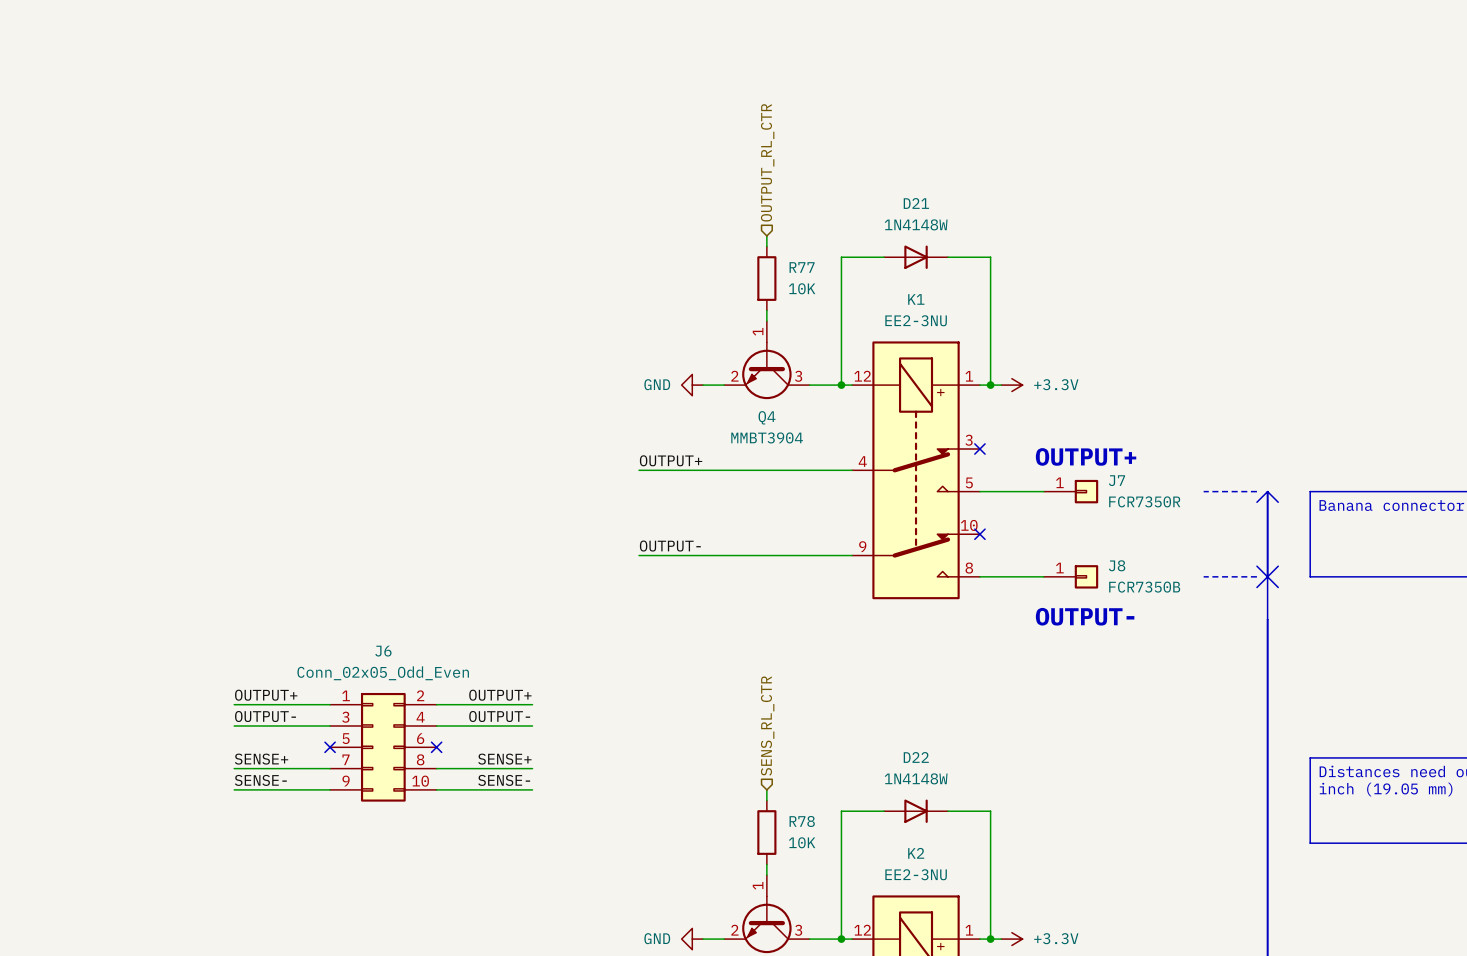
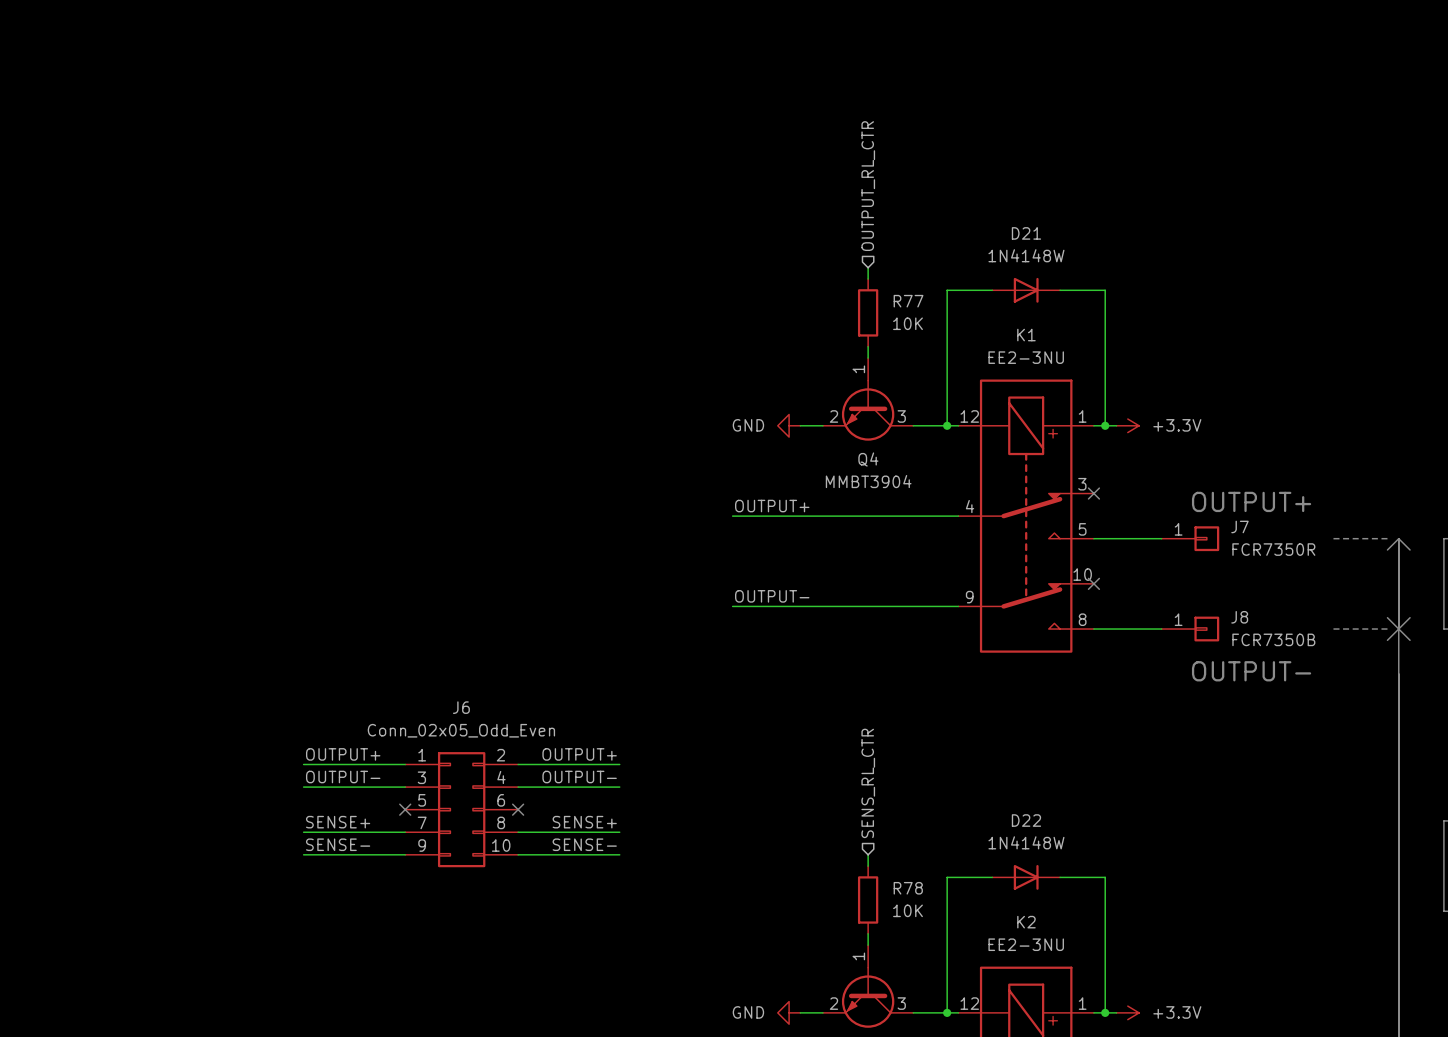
text position: OUTPUT+ (1086, 456) -> OUTPUT+ (1251, 501)
text position: OUTPUT- (1085, 616) -> OUTPUT- (1251, 671)

